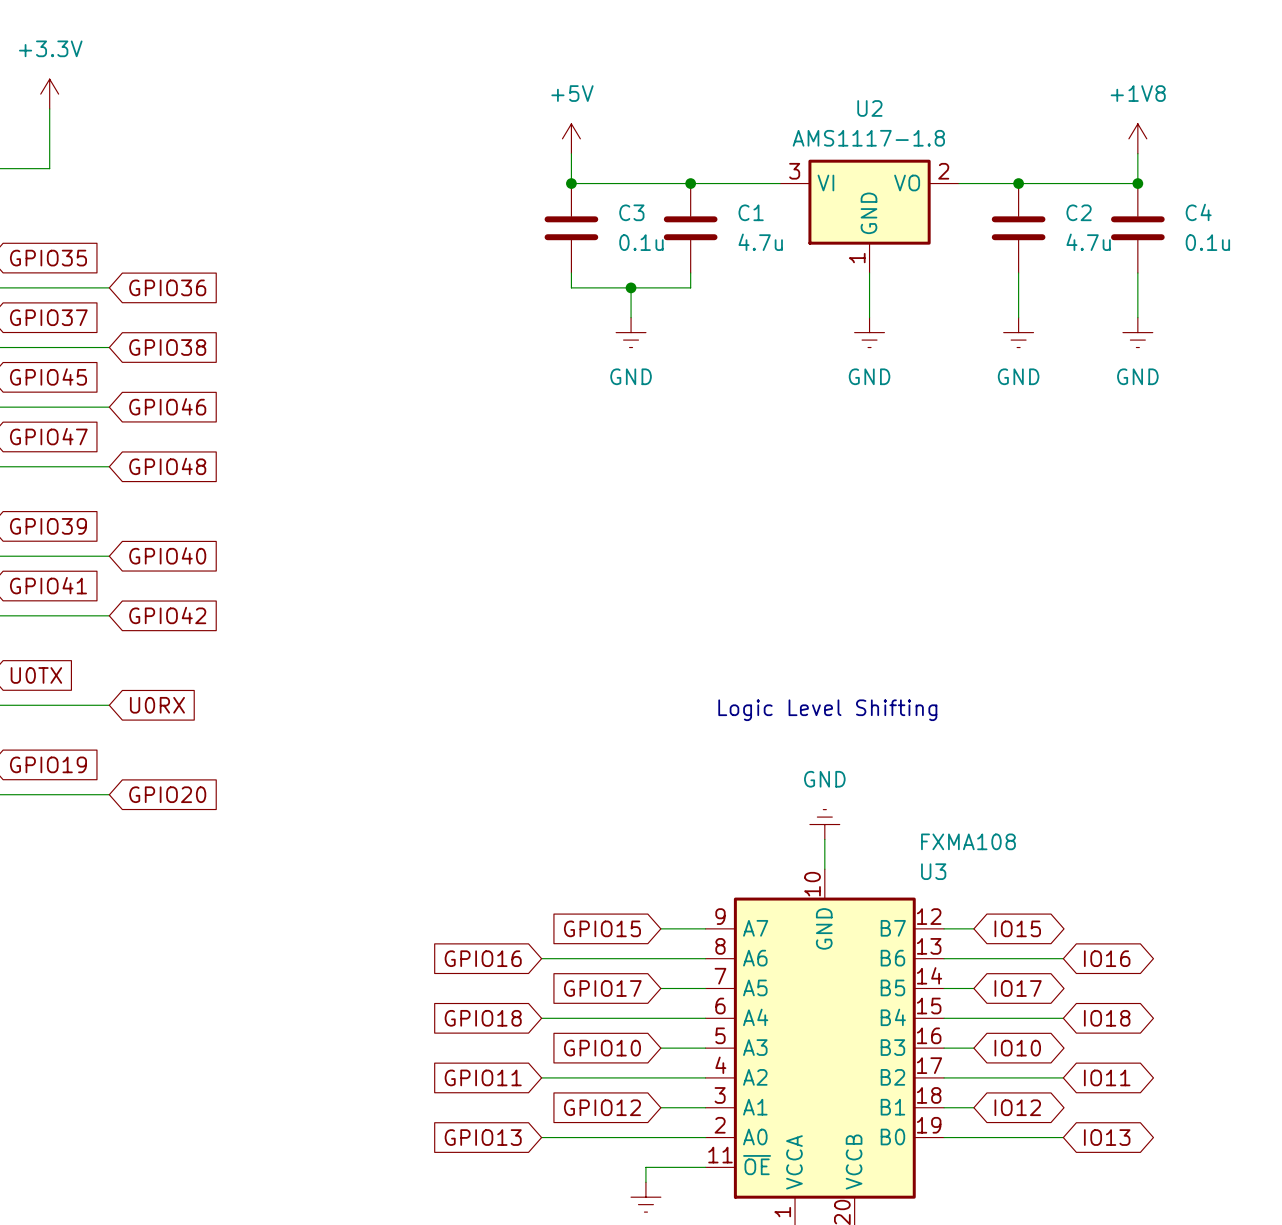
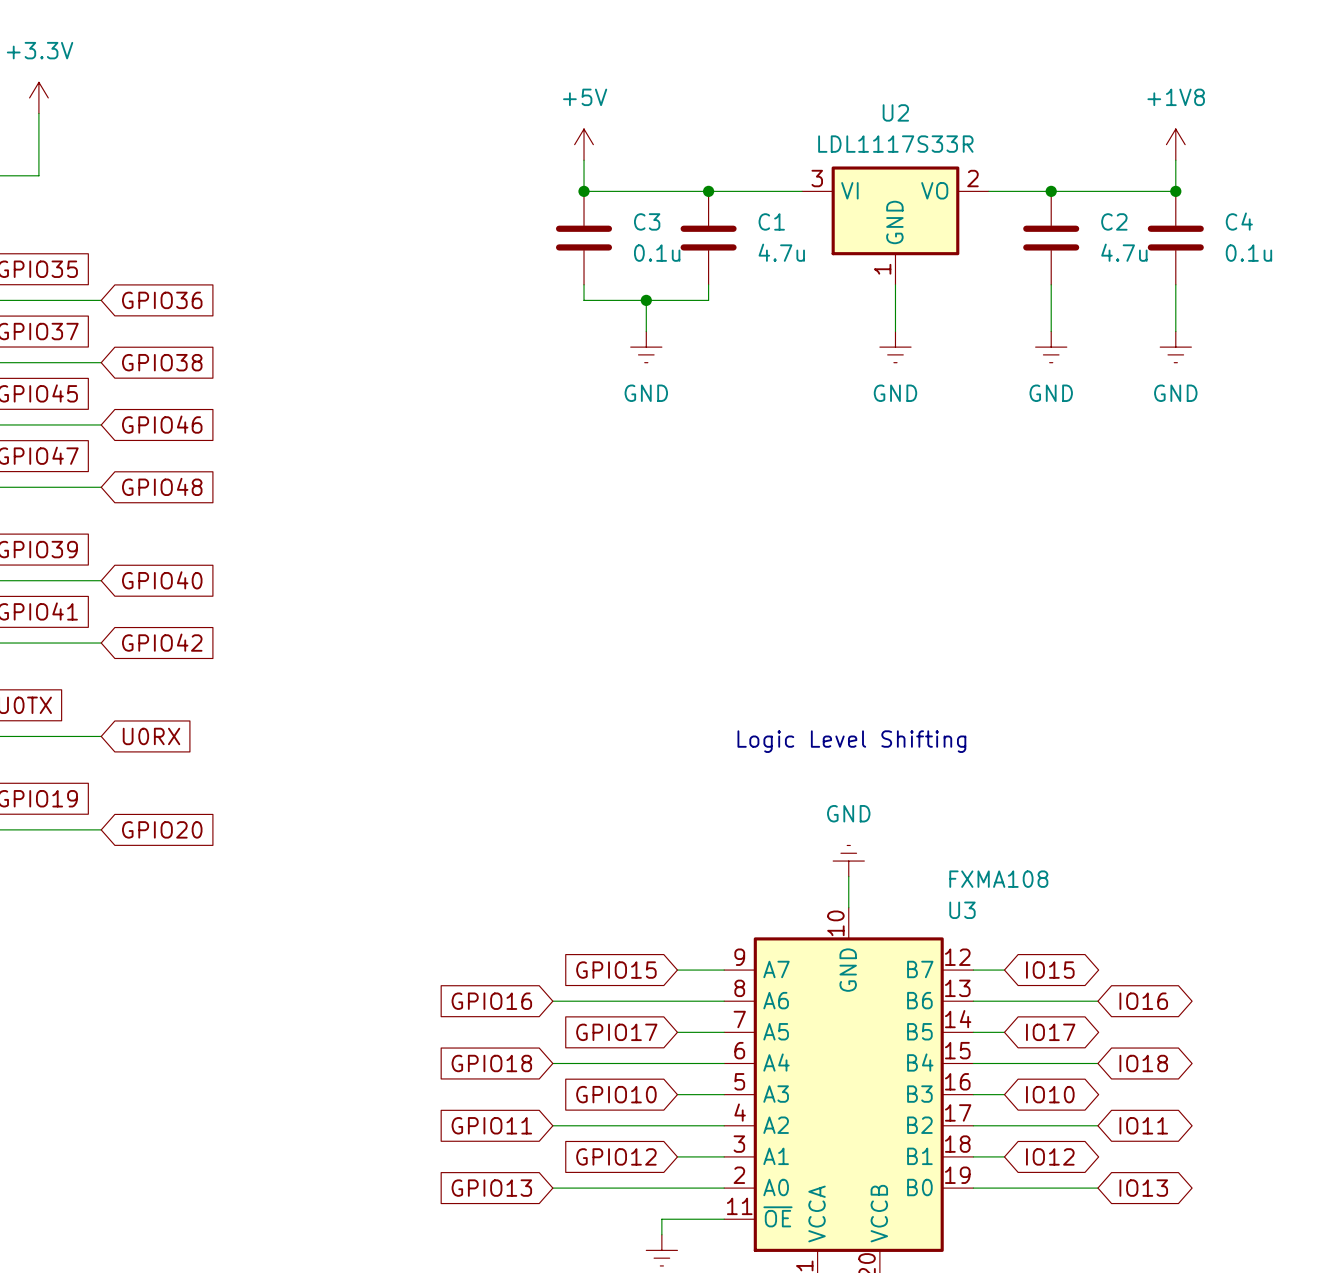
U2 value: AMS1117-1.8 (868, 138) -> LDL1117S33R (895, 144)

